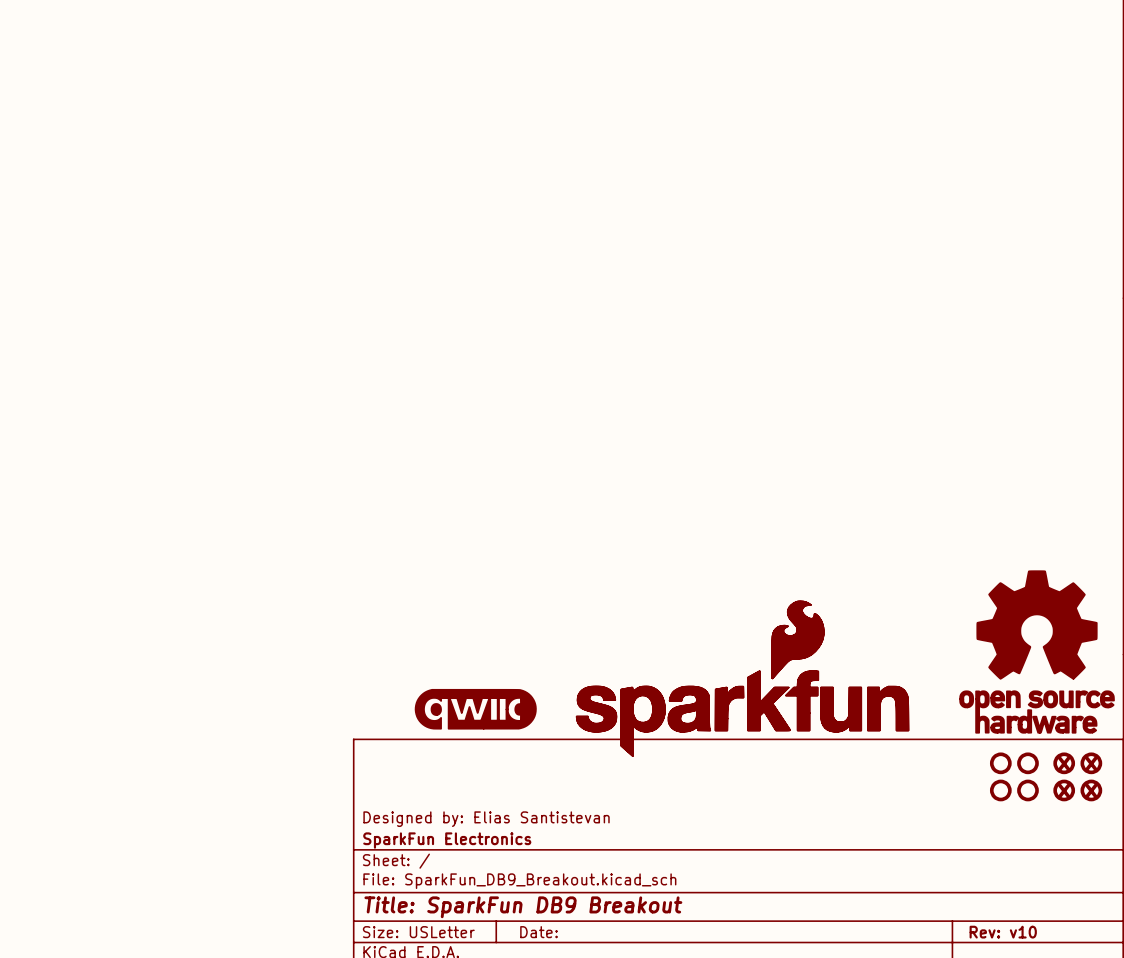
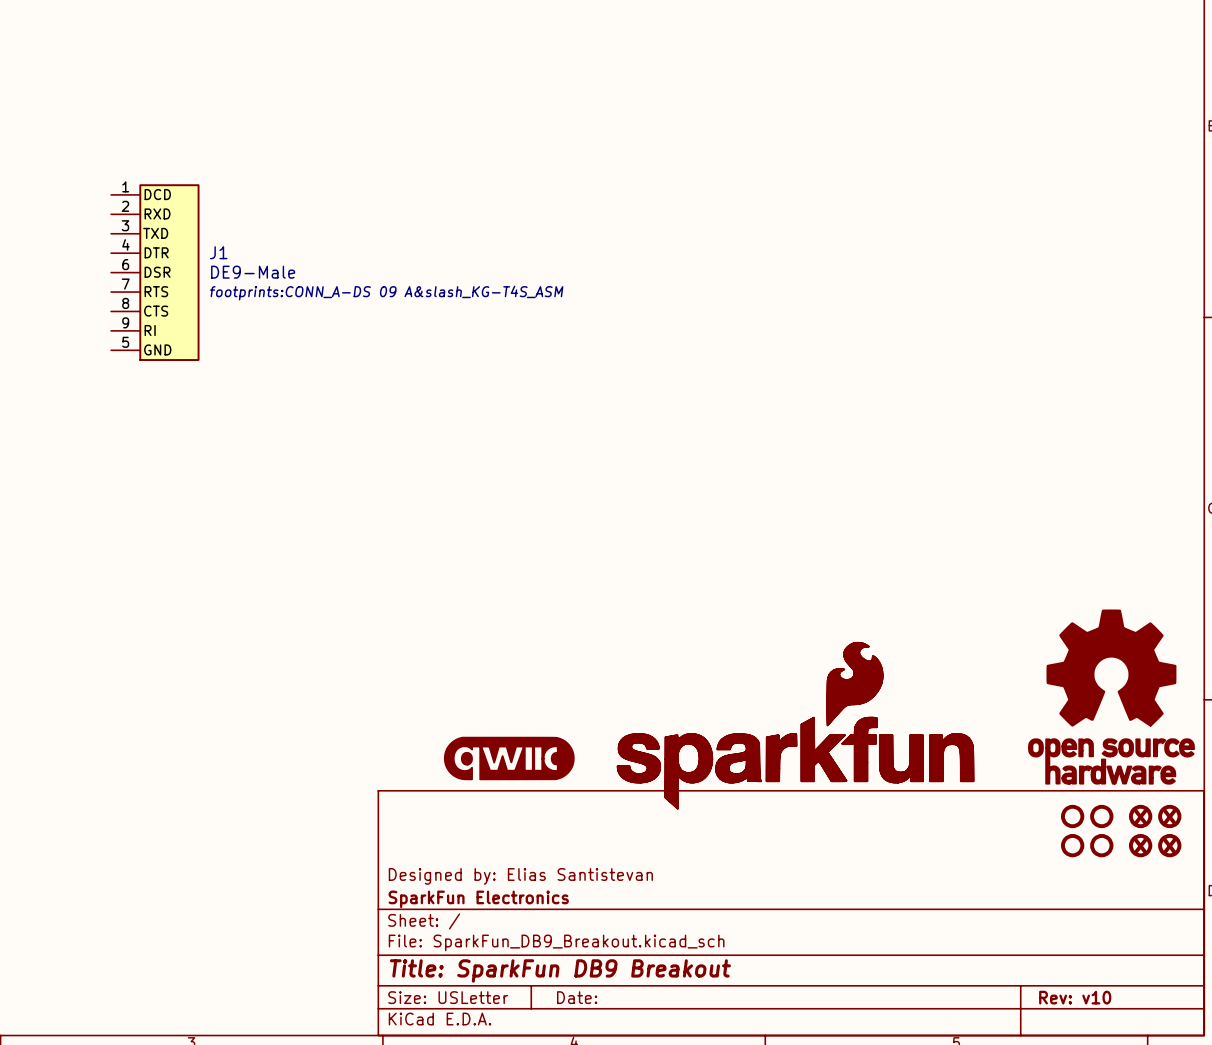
J1: none -> DE9-Male (155, 272)

